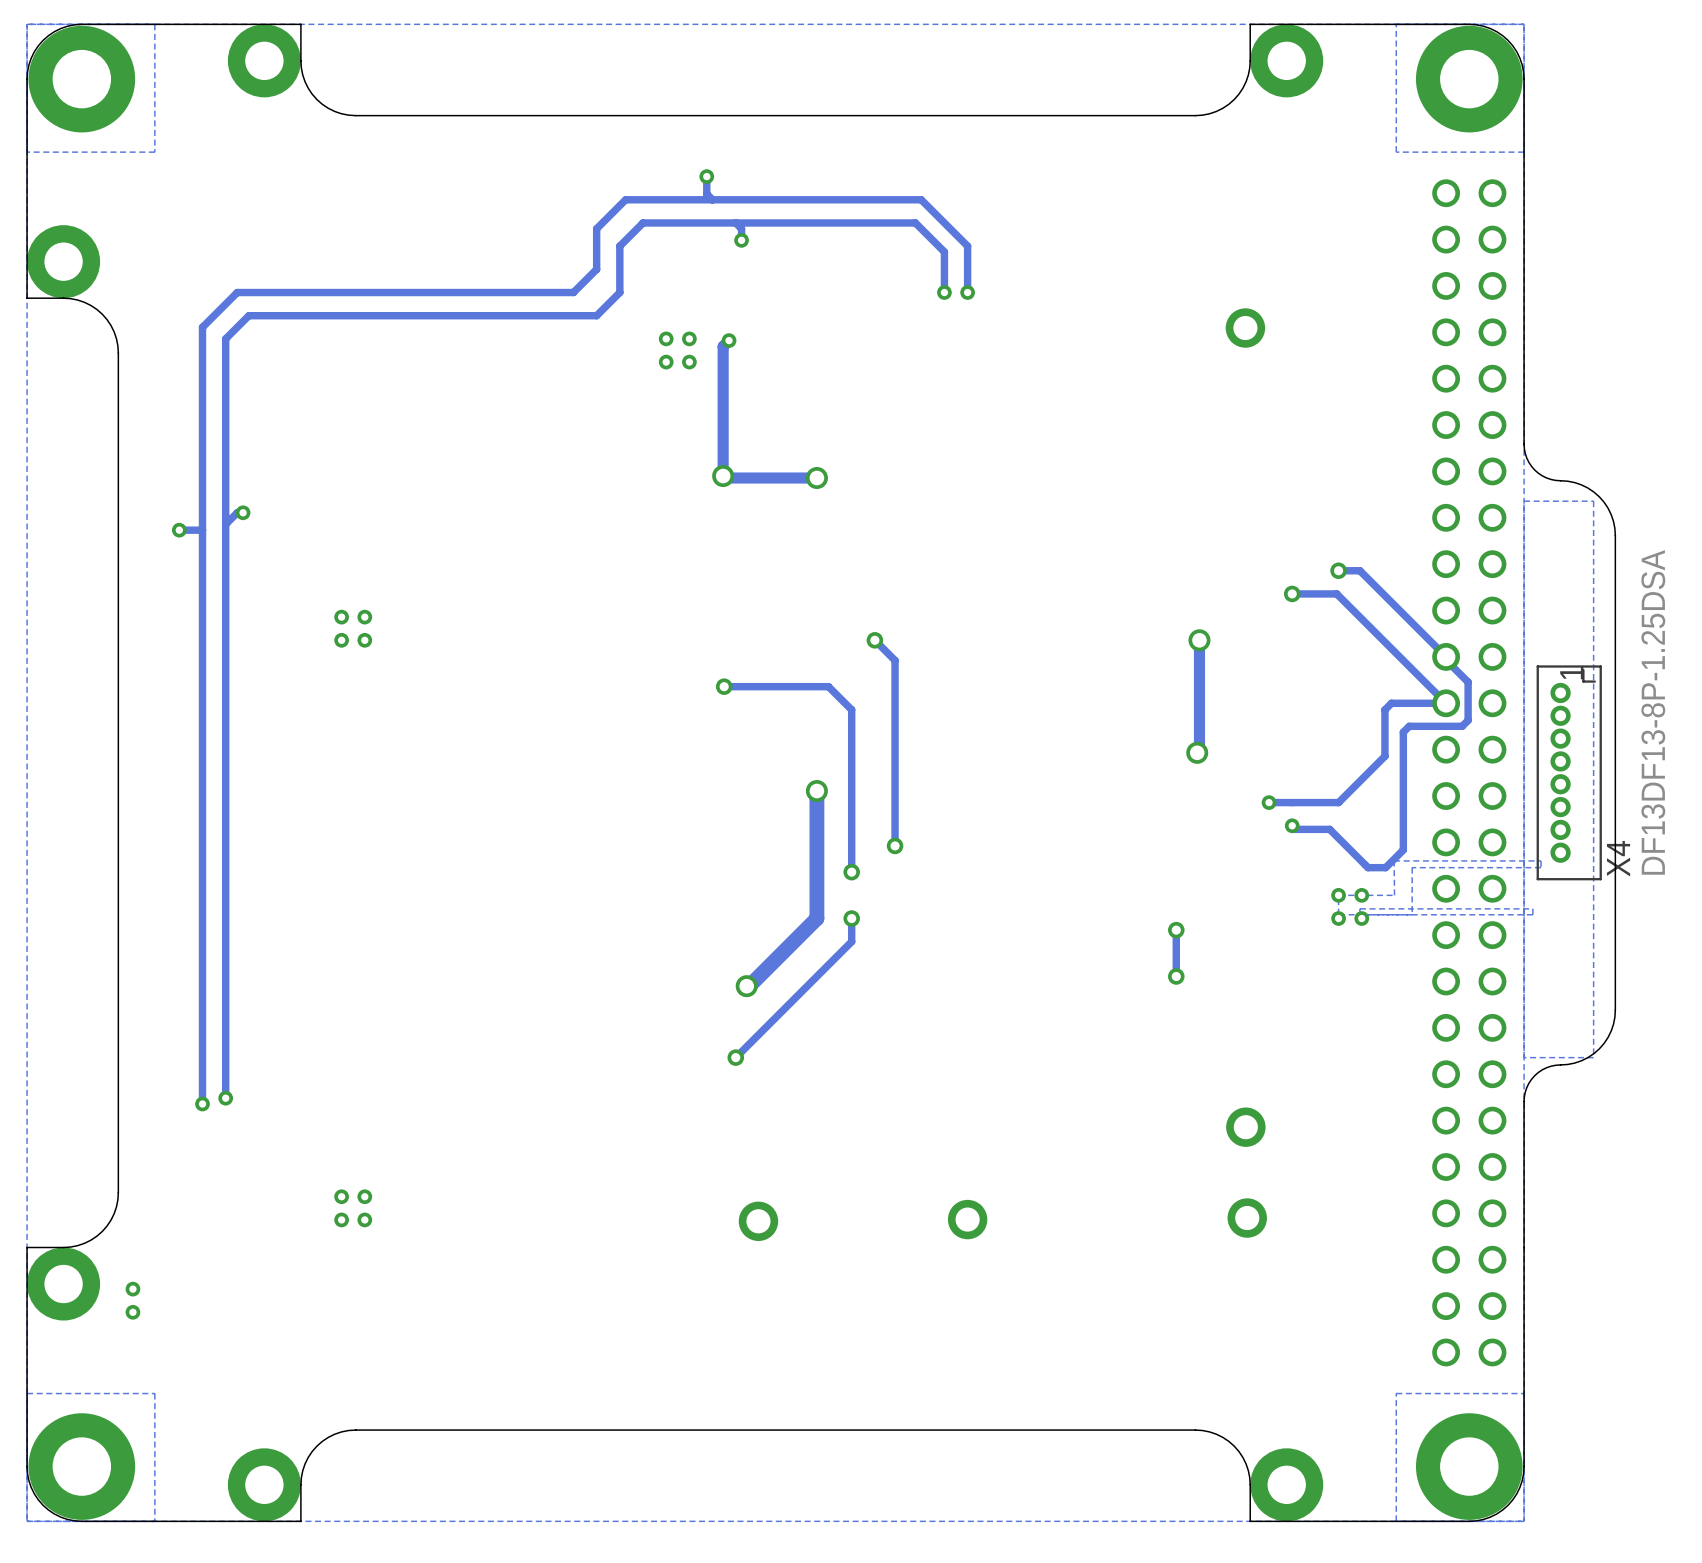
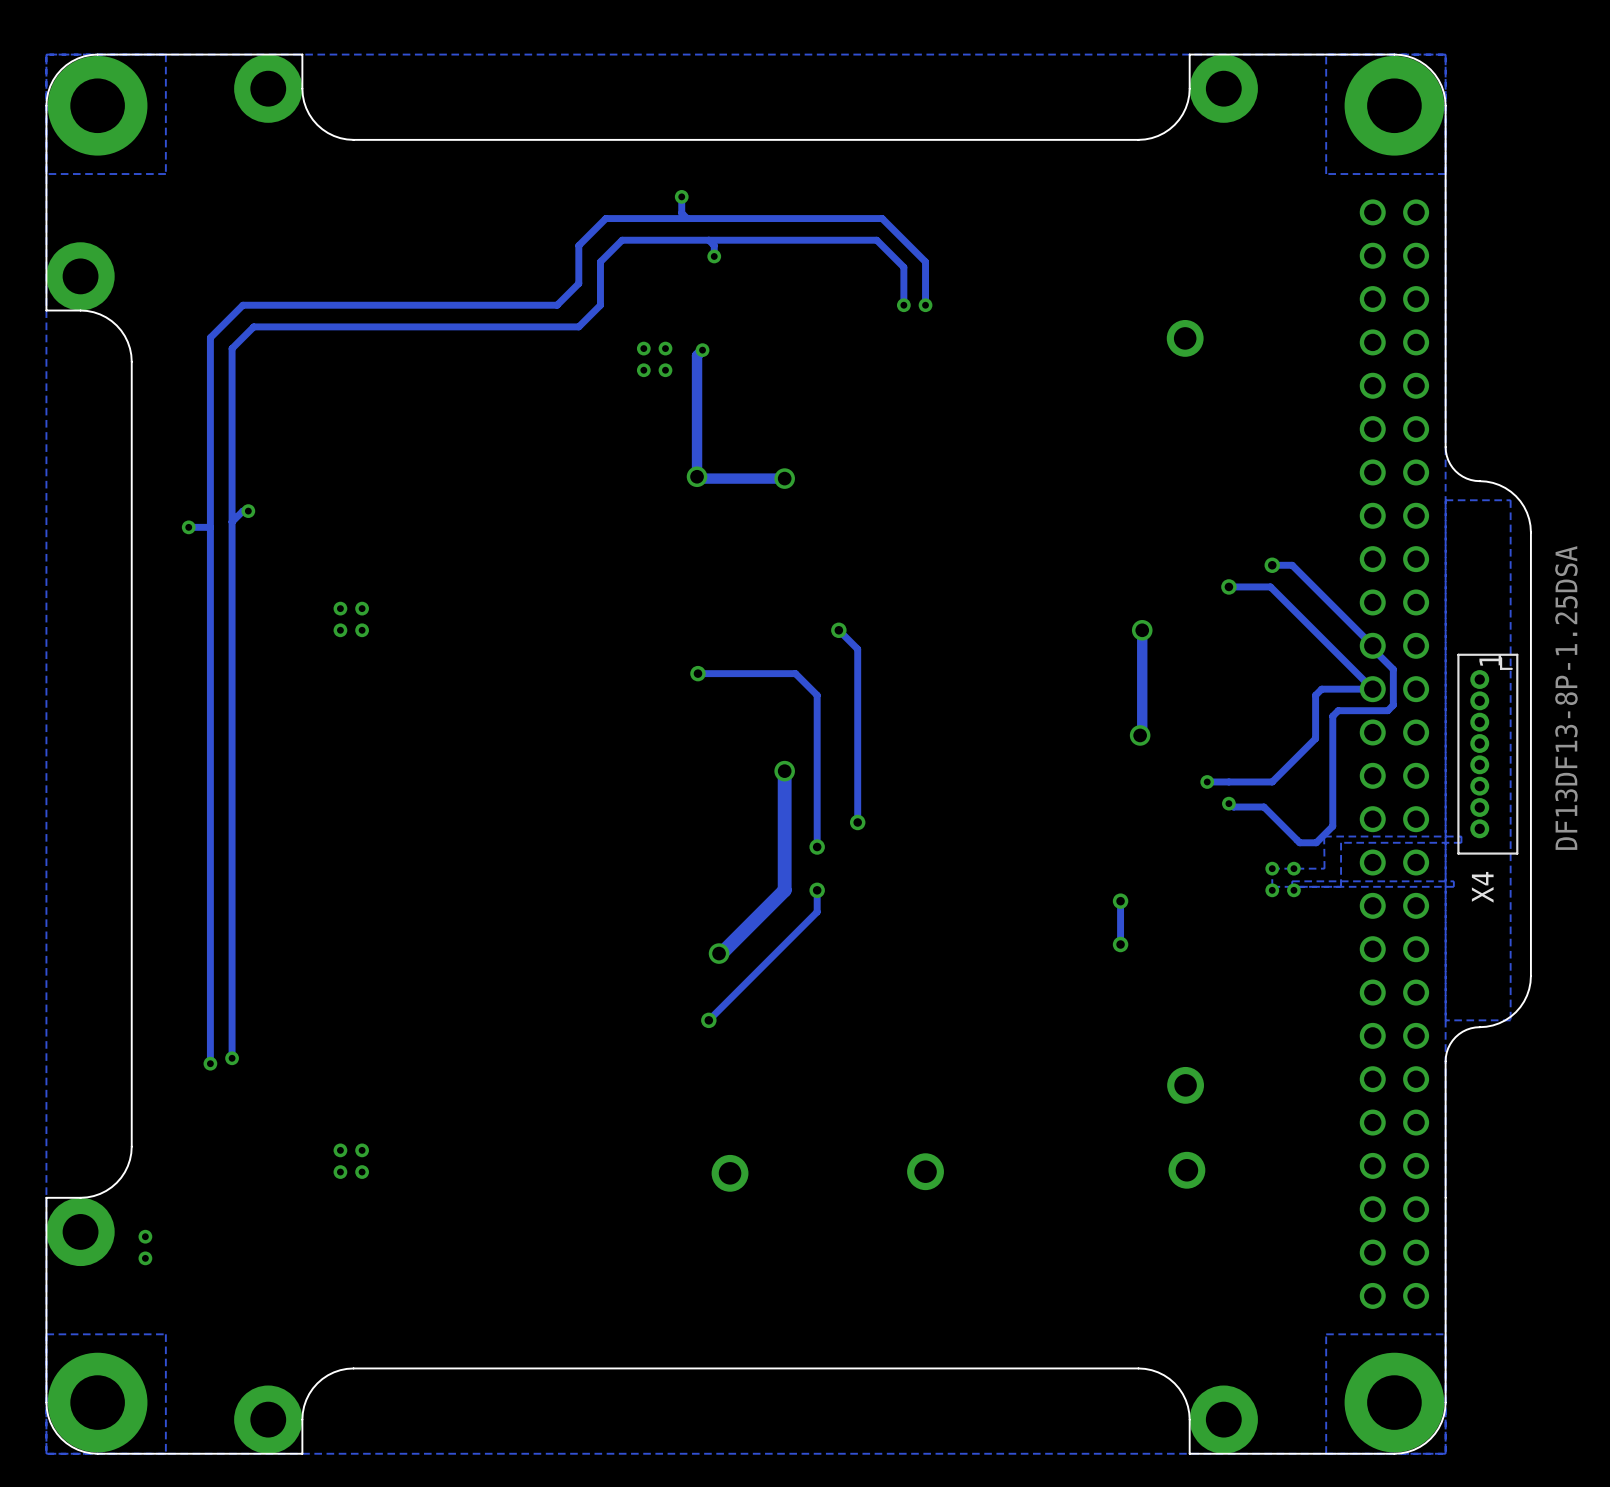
X4 name position: X4 (1618, 858) -> X4 (1482, 887)

